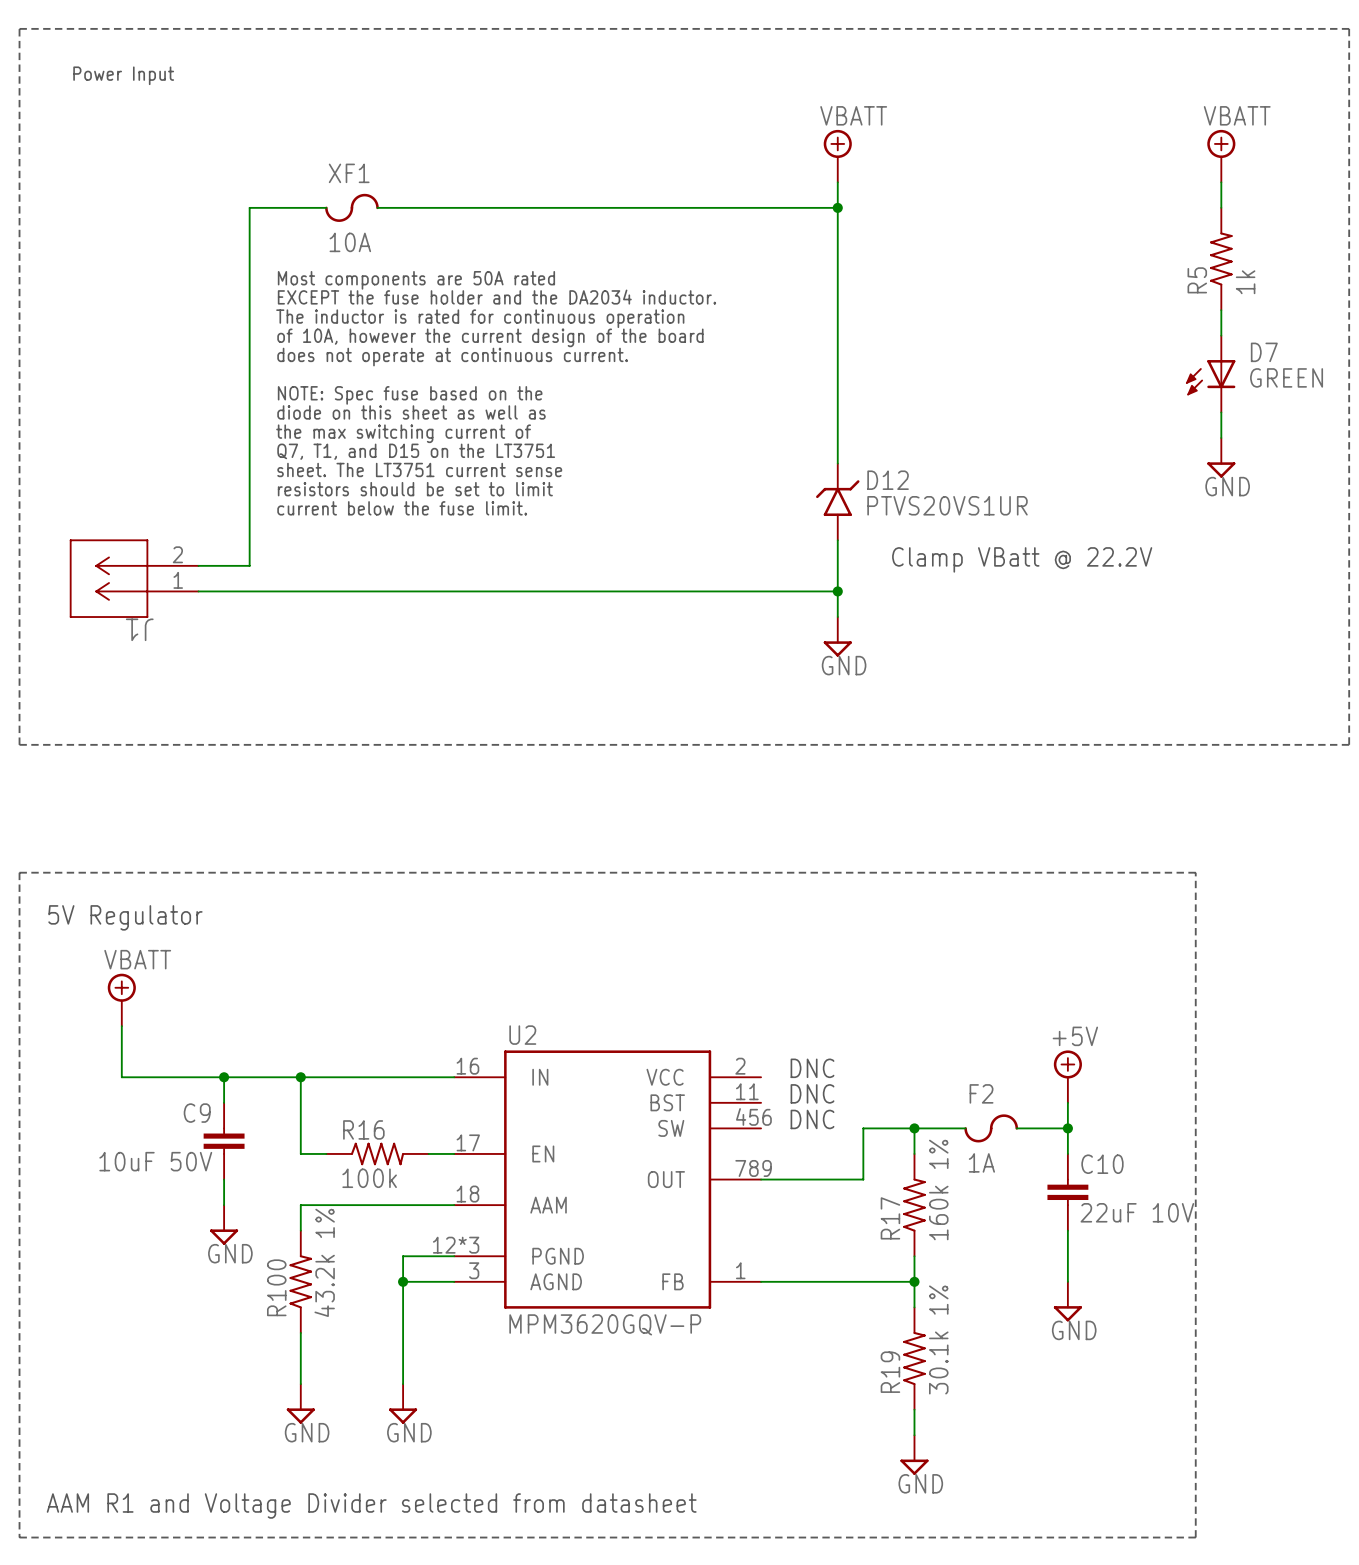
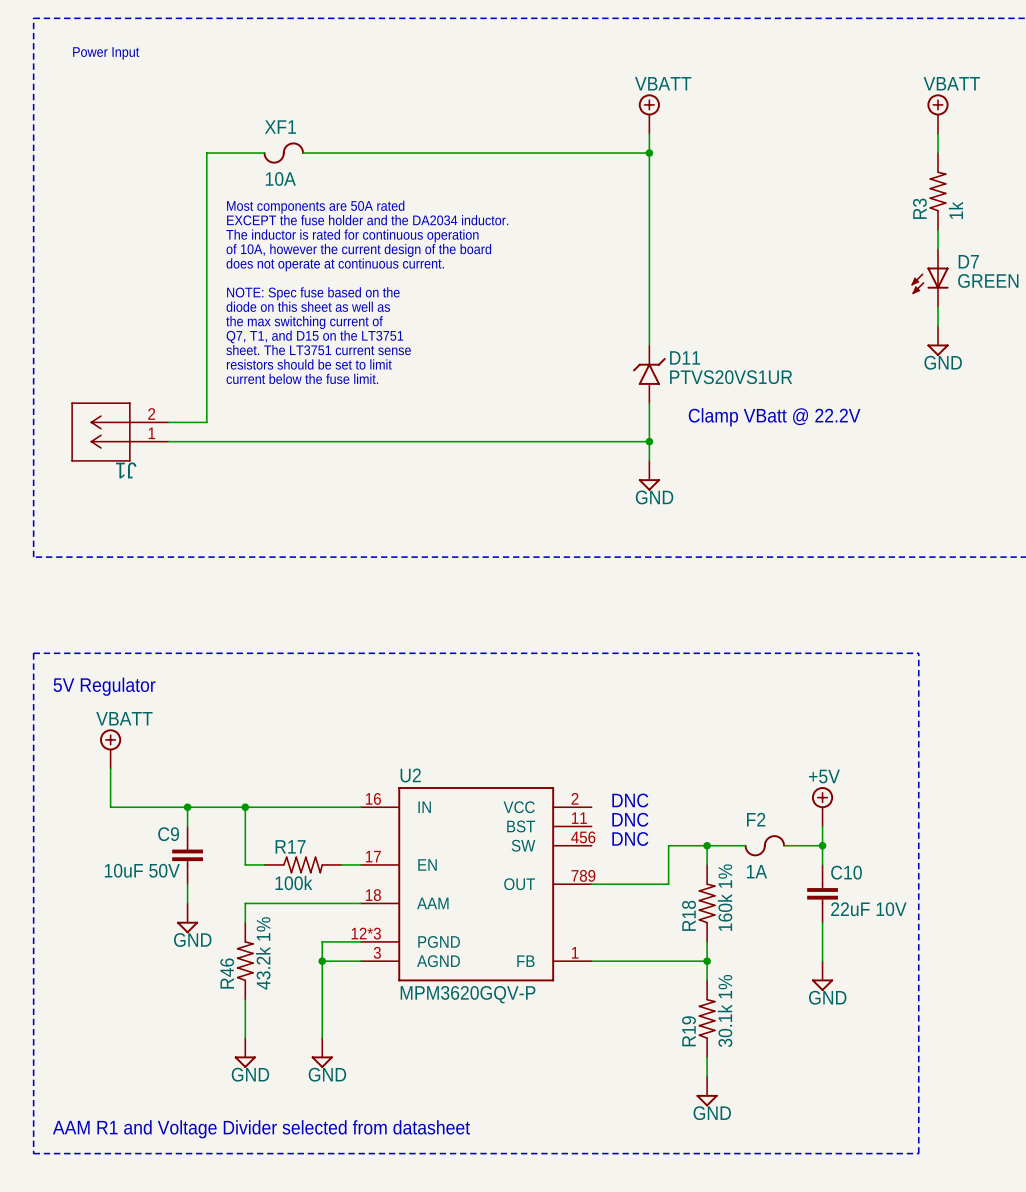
R5 name: R5 (1197, 280) -> R3 (919, 208)
D12 name: D12 (888, 480) -> D11 (685, 357)
R16 name: R16 (363, 1129) -> R17 (290, 846)
R17 name: R17 (890, 1218) -> R18 (689, 915)
R100 name: R100 (276, 1287) -> R46 (227, 973)

